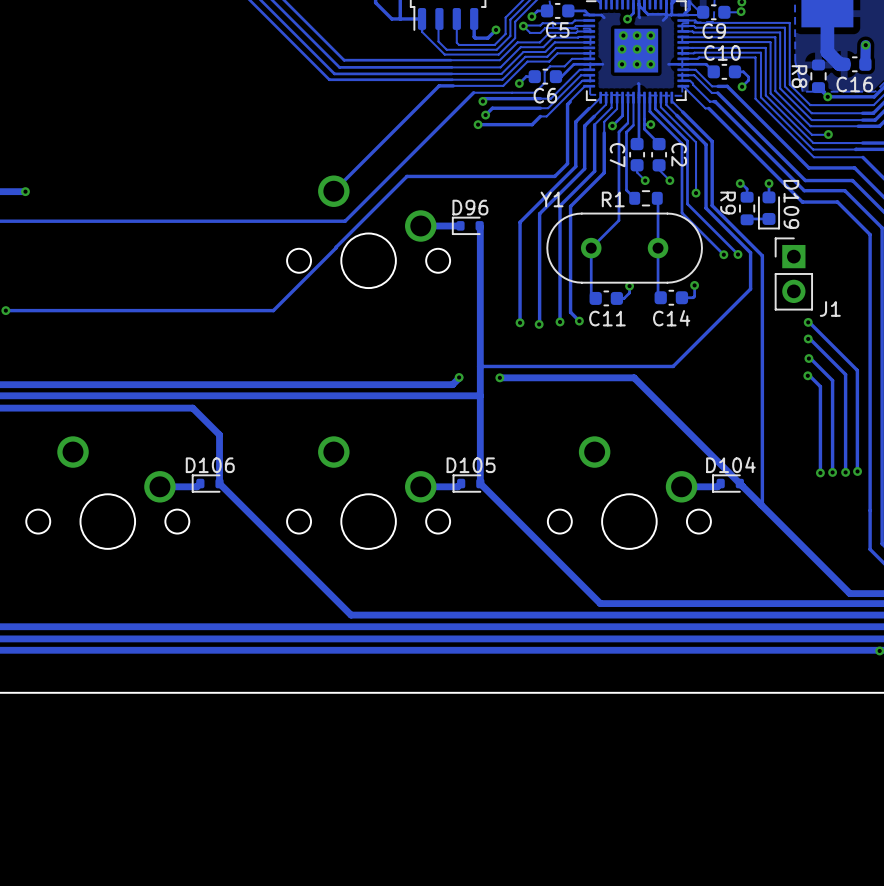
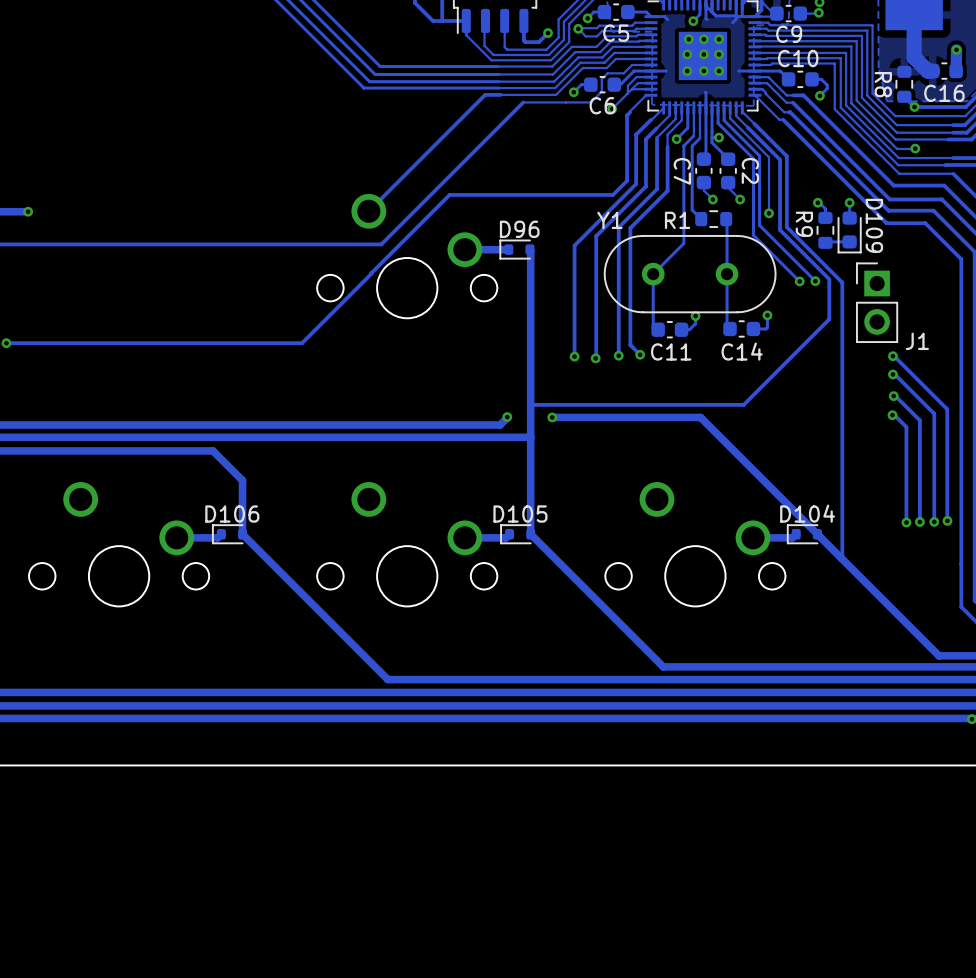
track: (579, 69) (550, 98) (484, 98) (481, 101) (482, 100) -> (640, 77) (636, 77) (627, 85) (627, 93)
track: (581, 75) (548, 108) (492, 108) (485, 115) -> (642, 83) (637, 83) (612, 108)
track: (582, 80) (546, 116) (540, 116) (532, 124) (478, 124) -> (643, 89) (631, 89)
via: none -> (612, 108)
via: (482, 101) -> none
via: (485, 115) -> none
via: (478, 124) -> none

